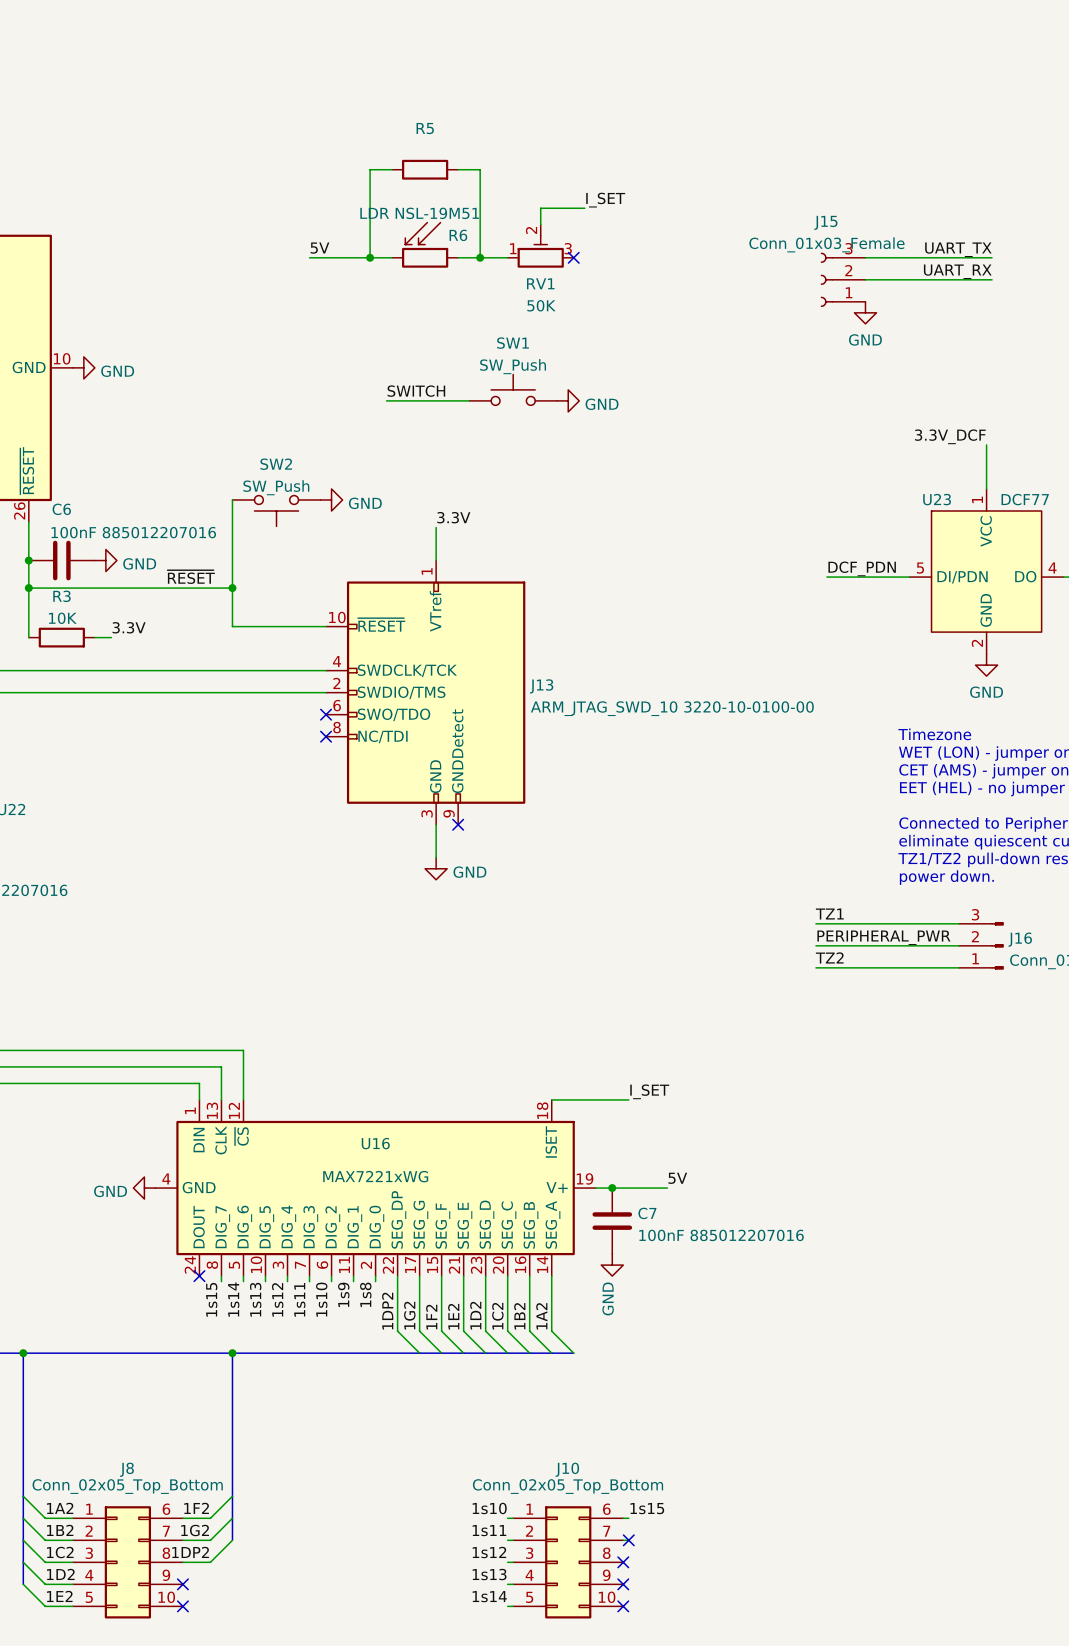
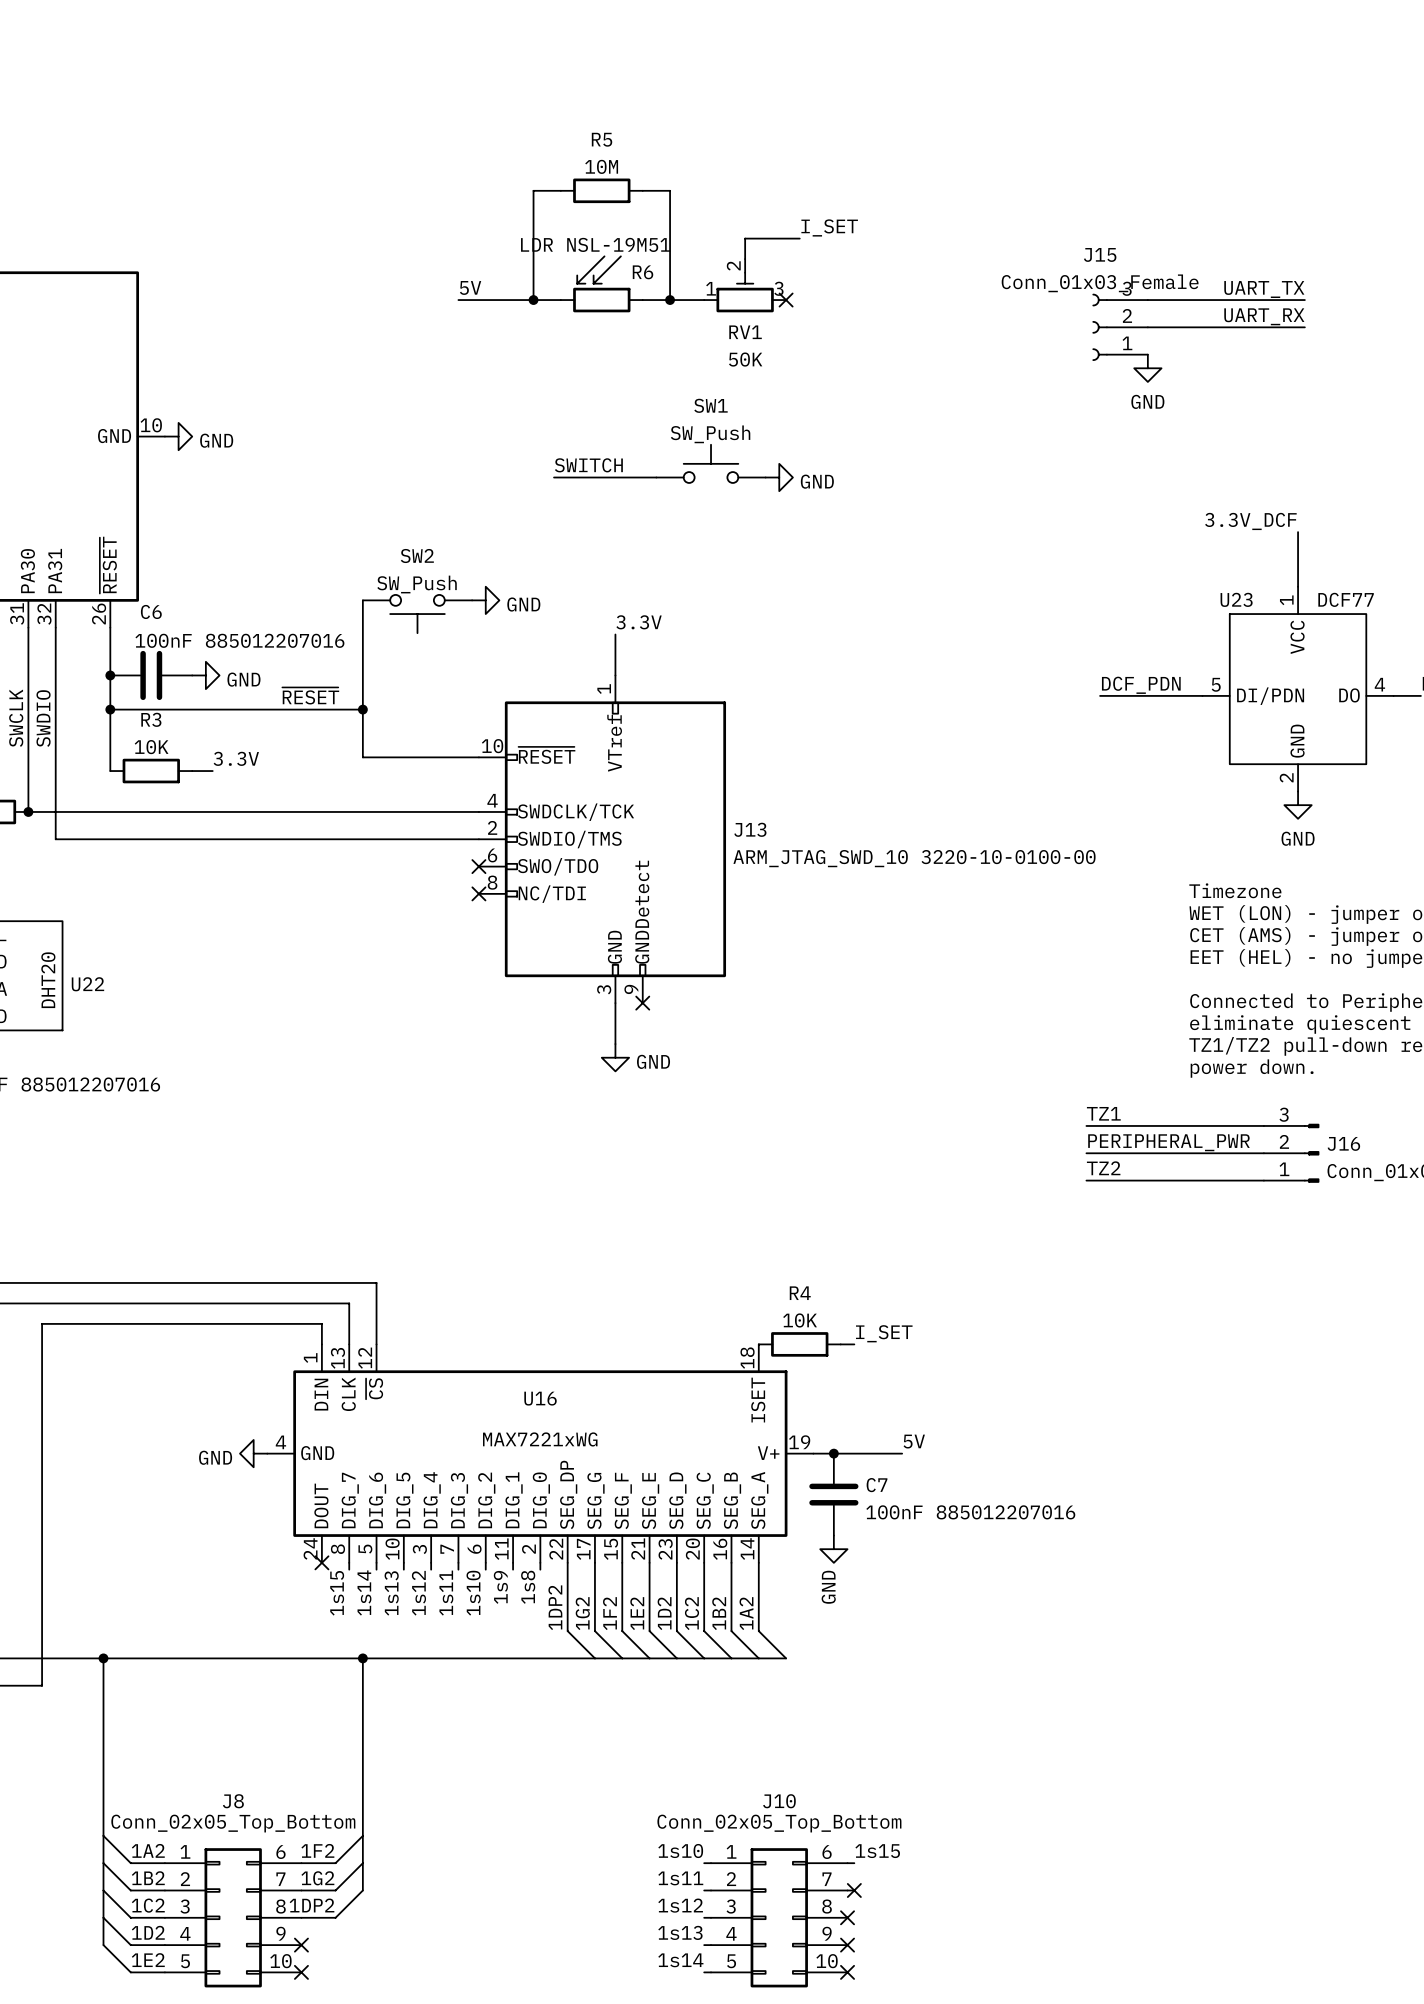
R5 value: none -> 10M (601, 166)
wire: (551, 1099) (617, 1099) -> none
R4: none -> 10K (799, 1344)

